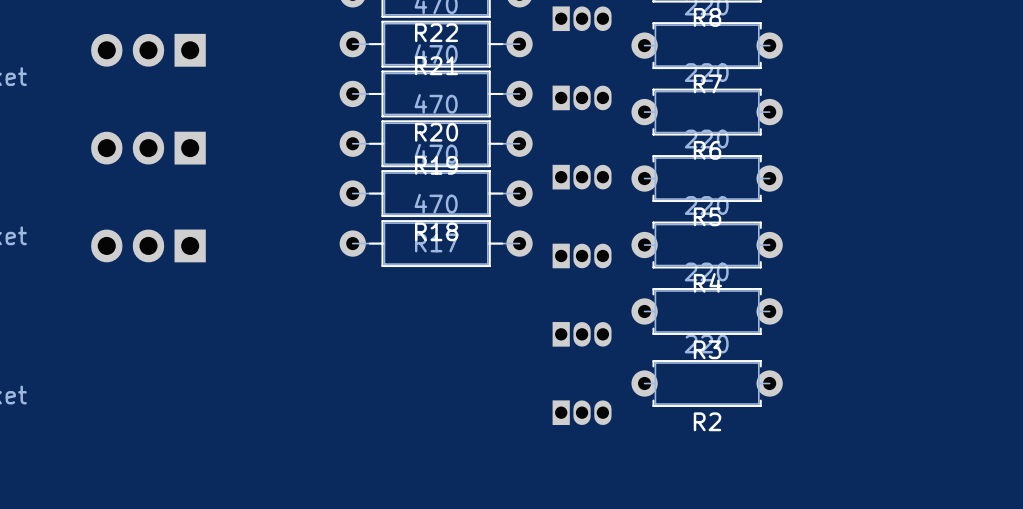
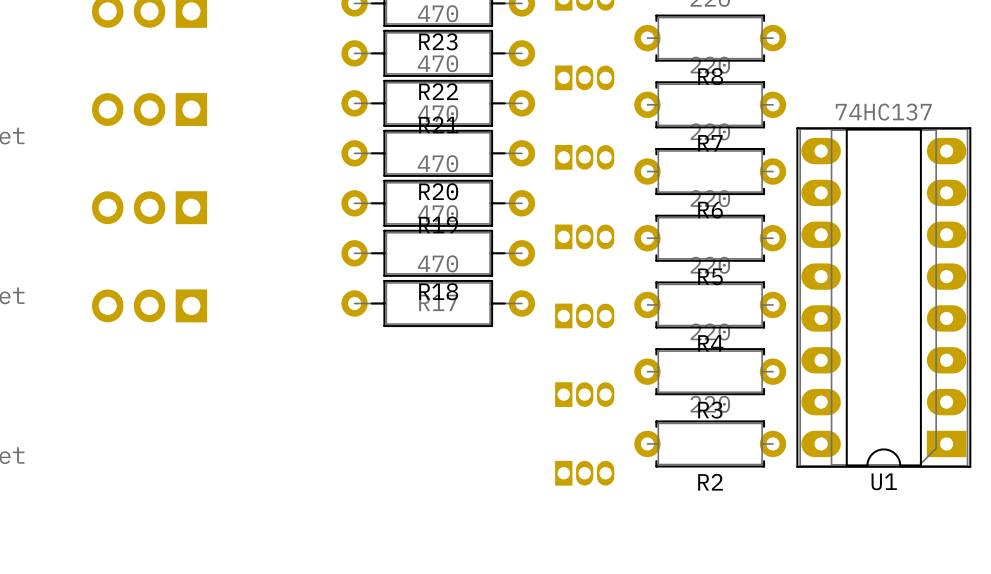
U1: none -> 74HC137 (883, 297)

